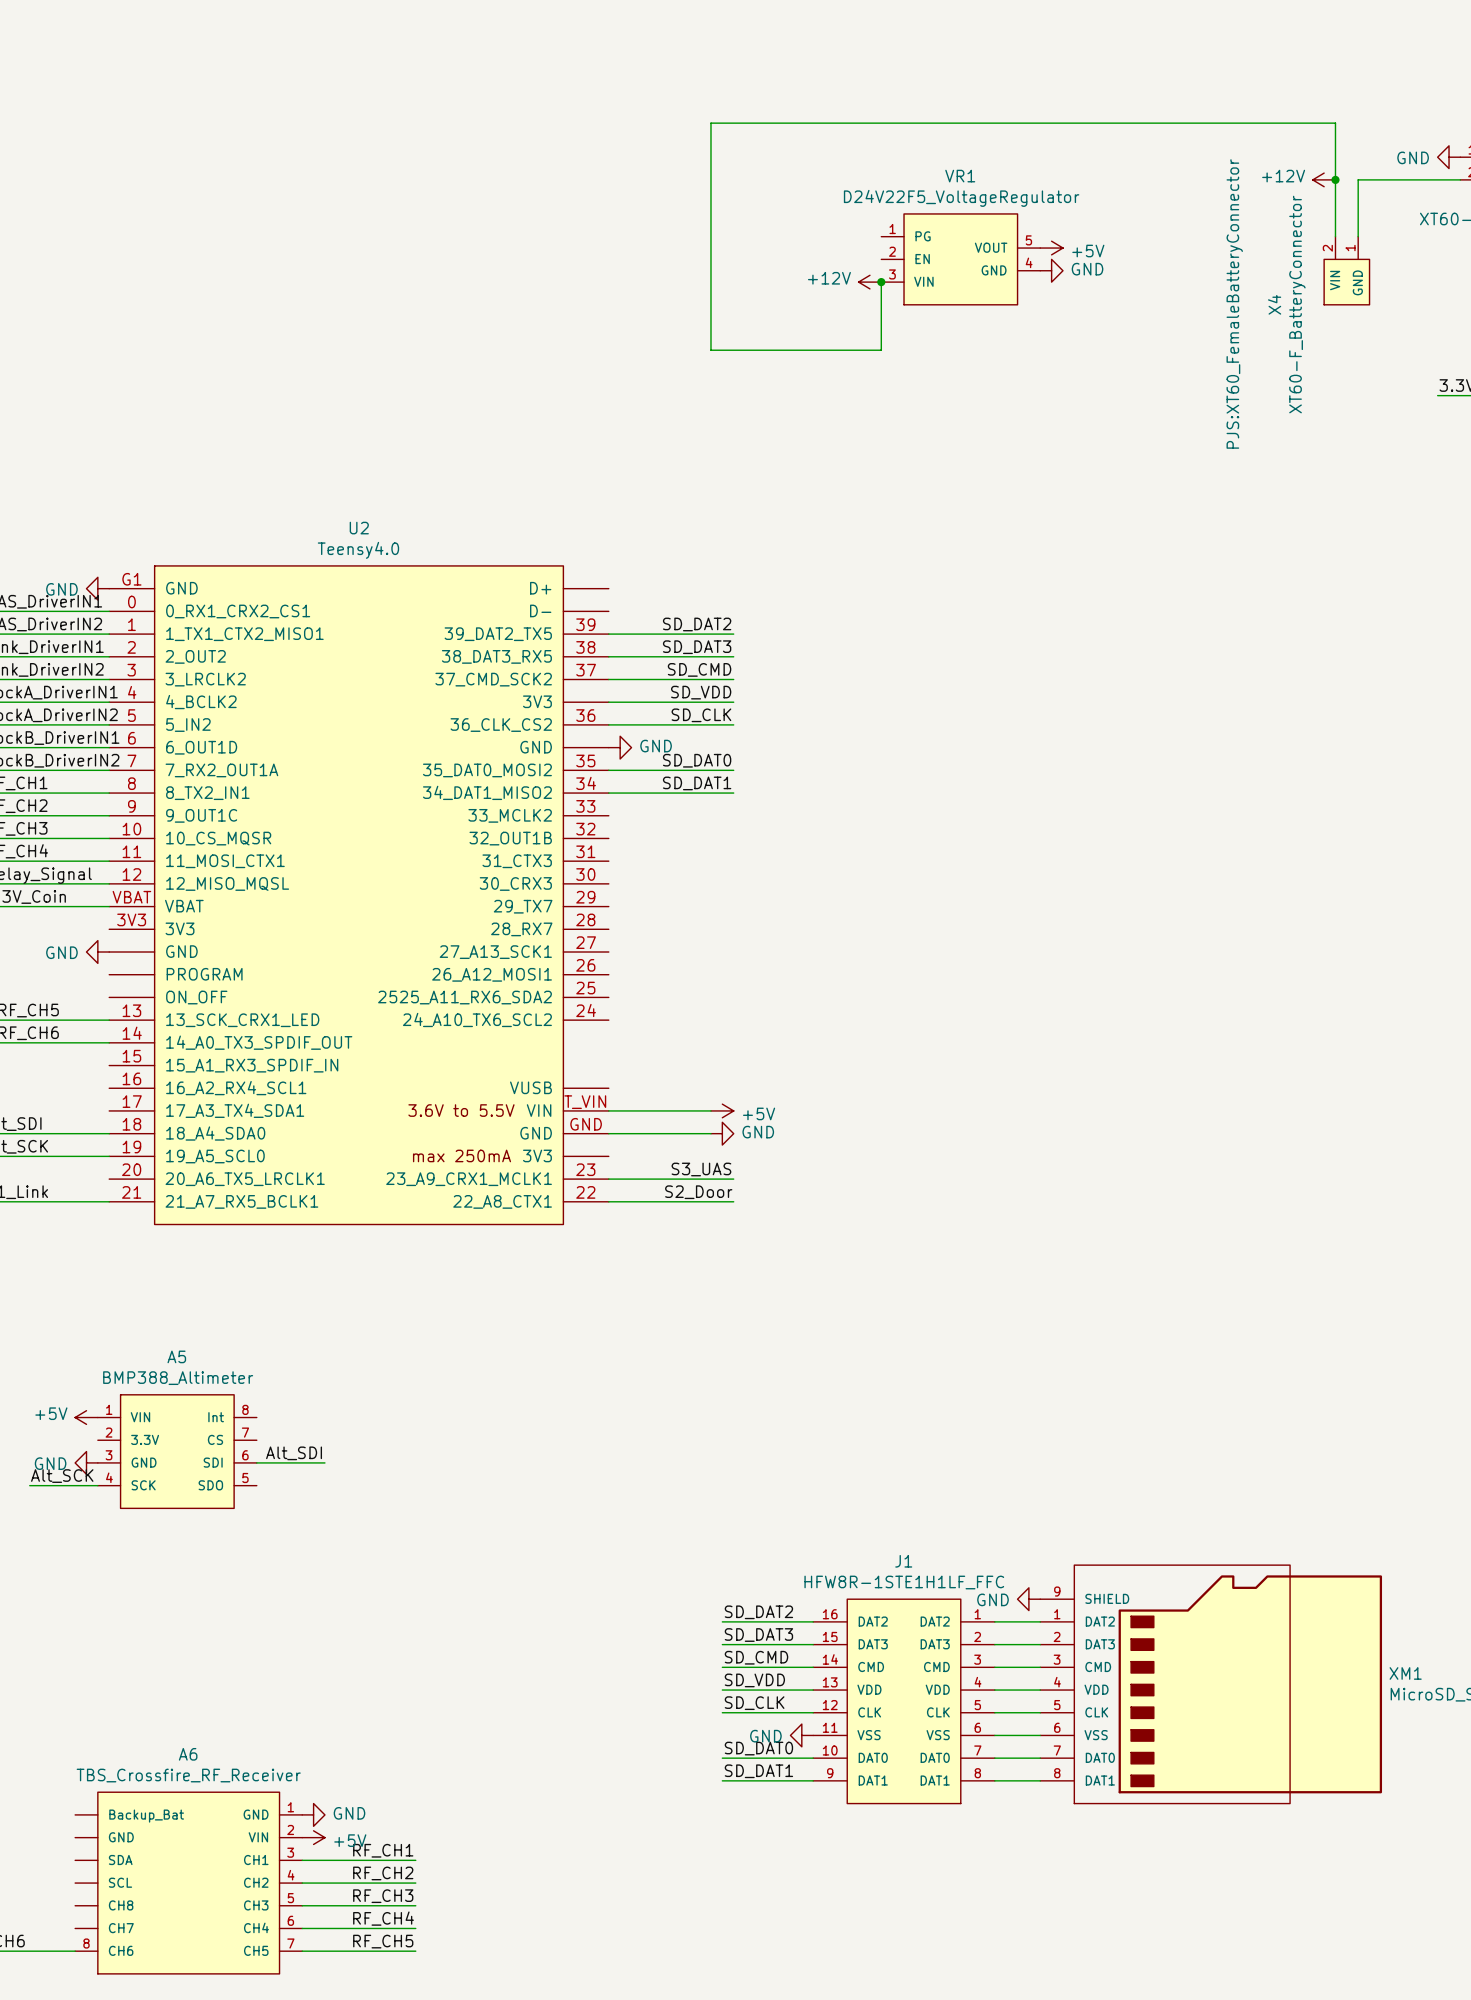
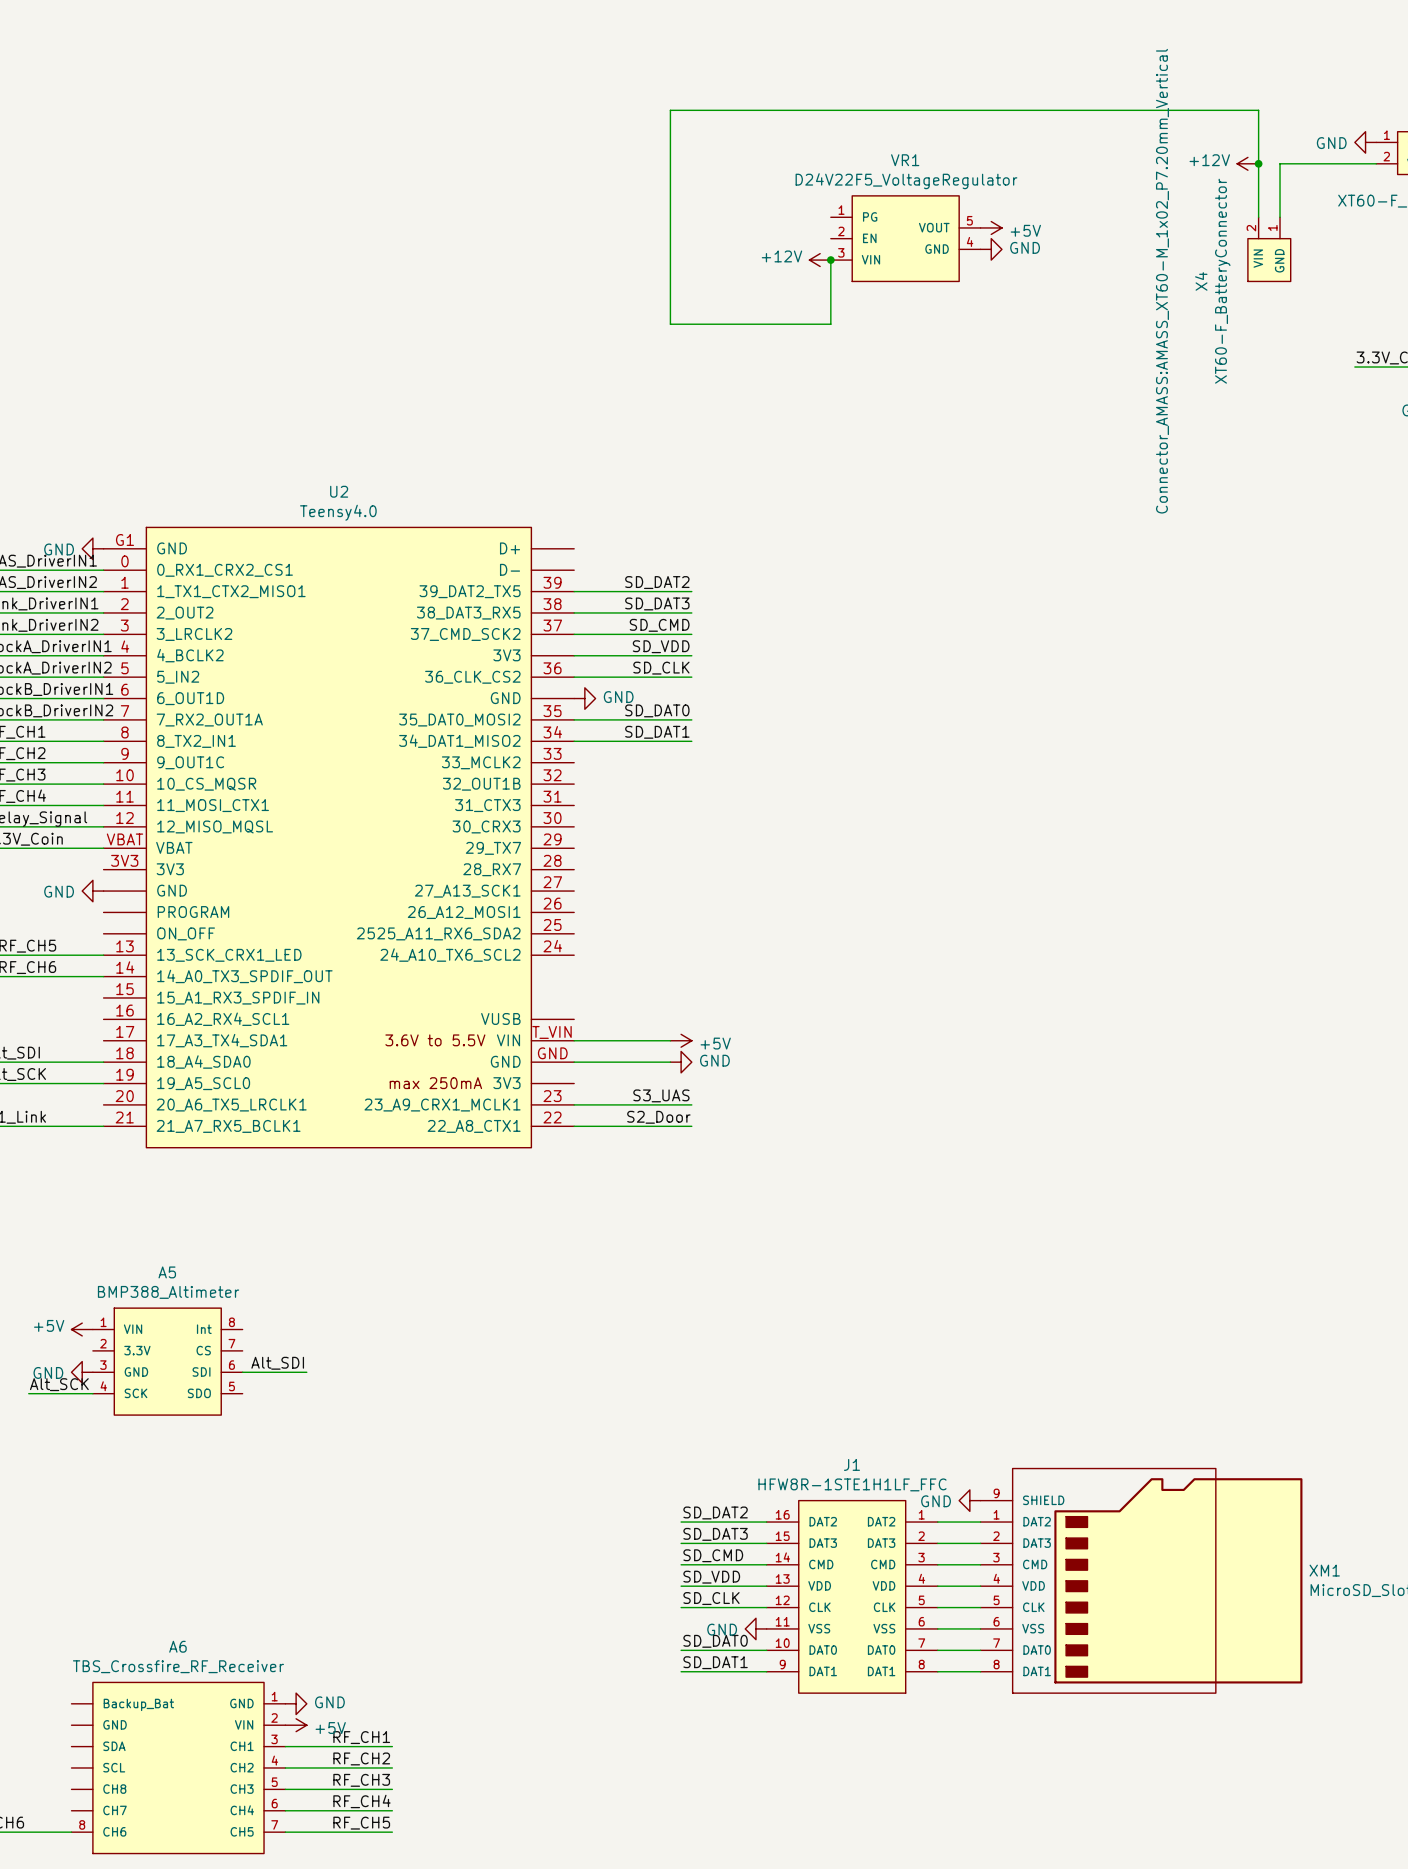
X4 text: PJS:XT60_FemaleBatteryConnector (1234, 303) -> Connector_AMASS:AMASS_XT60-M_1x02_P7.20mm_Vertical (1162, 281)

